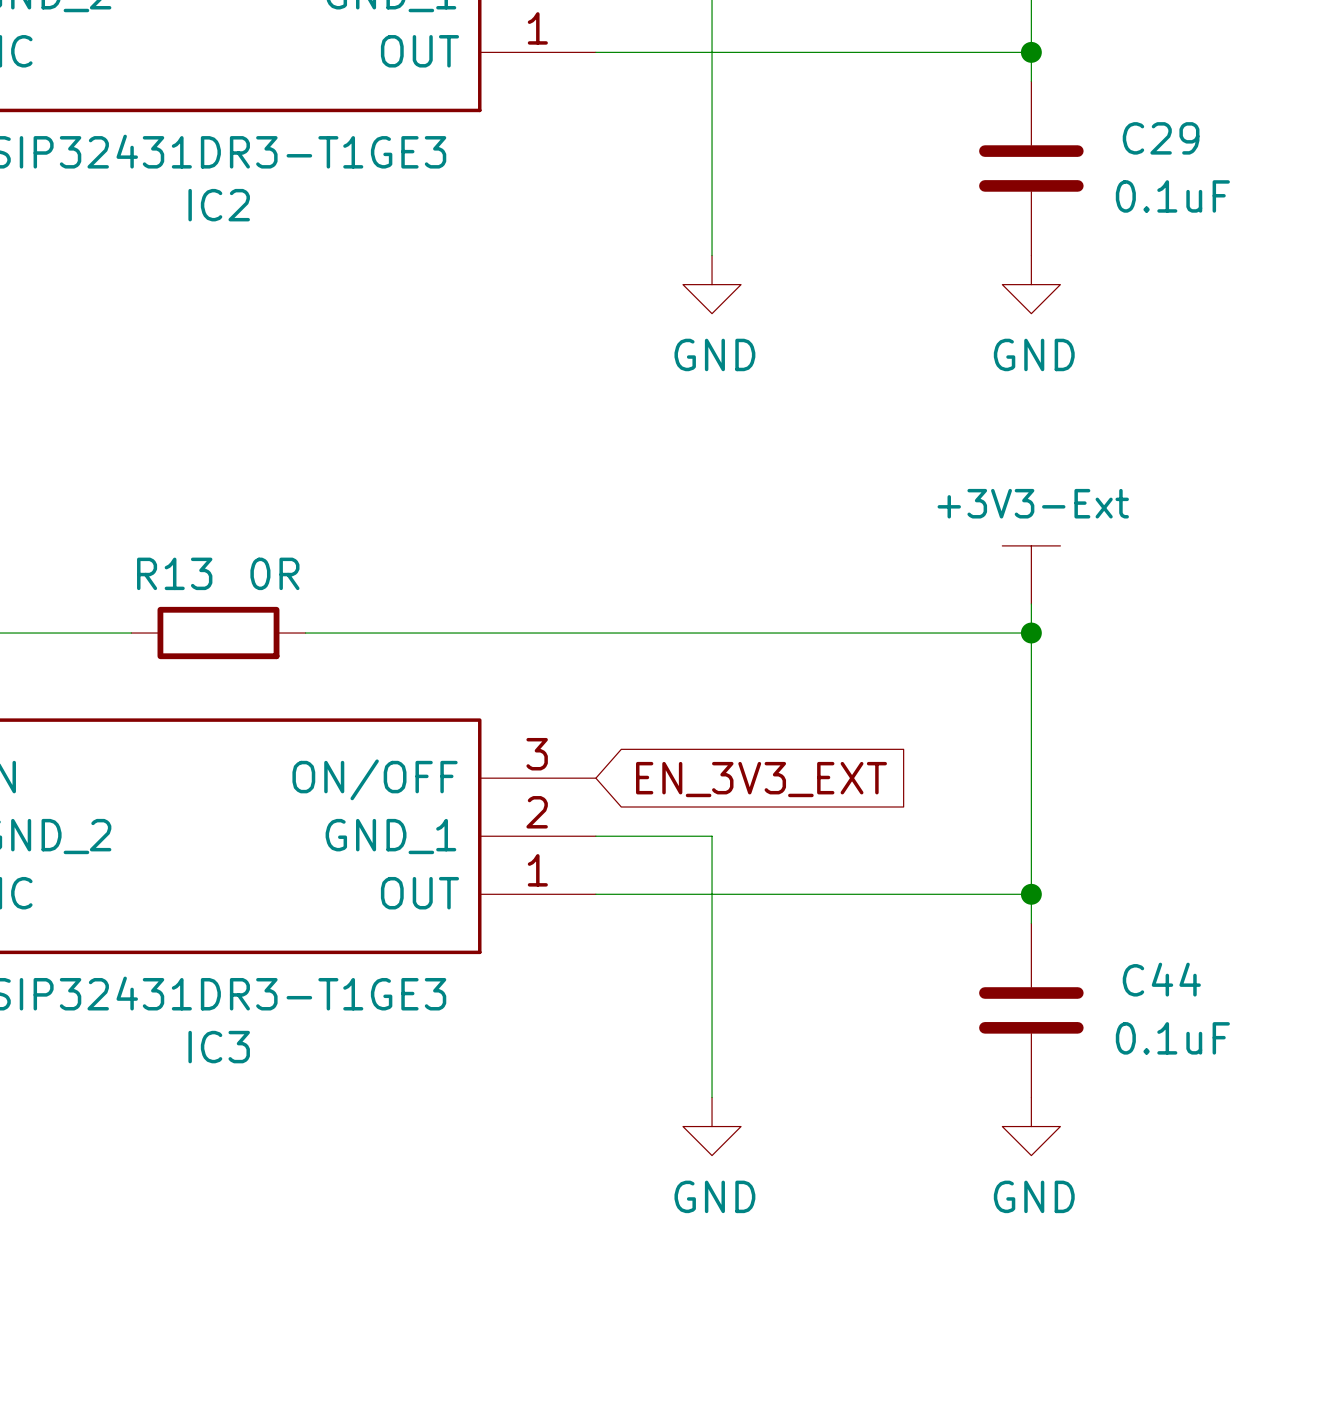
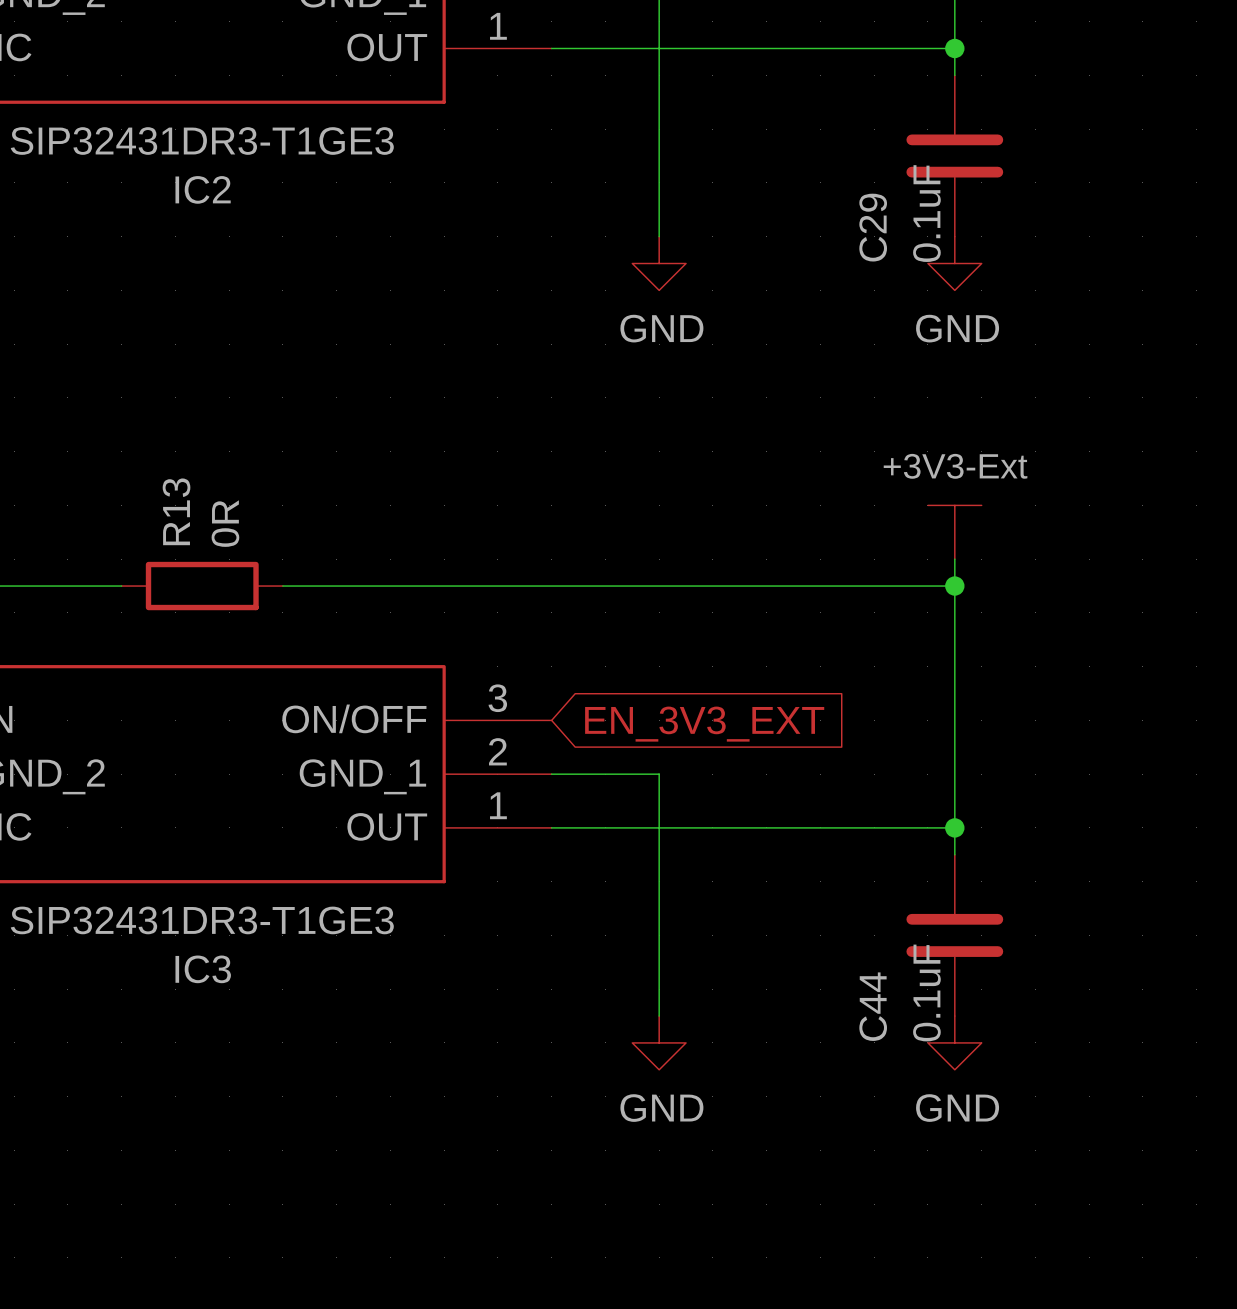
C29 name rotation: 0° (1161, 138) -> 90° counterclockwise (873, 227)
C29 name position: C29 (1161, 138) -> C29 (873, 227)
C29 value rotation: 0° (1172, 196) -> 90° counterclockwise (926, 213)
C29 value position: 0.1uF (1172, 196) -> 0.1uF (926, 213)
R13 name rotation: 0° (174, 573) -> 90° counterclockwise (176, 511)
R13 value rotation: 0° (274, 573) -> 90° counterclockwise (225, 523)
C44 name rotation: 0° (1161, 979) -> 90° counterclockwise (873, 1006)
C44 name position: C44 (1161, 979) -> C44 (873, 1006)
C44 value rotation: 0° (1172, 1038) -> 90° counterclockwise (926, 993)
C44 value position: 0.1uF (1172, 1038) -> 0.1uF (926, 993)

